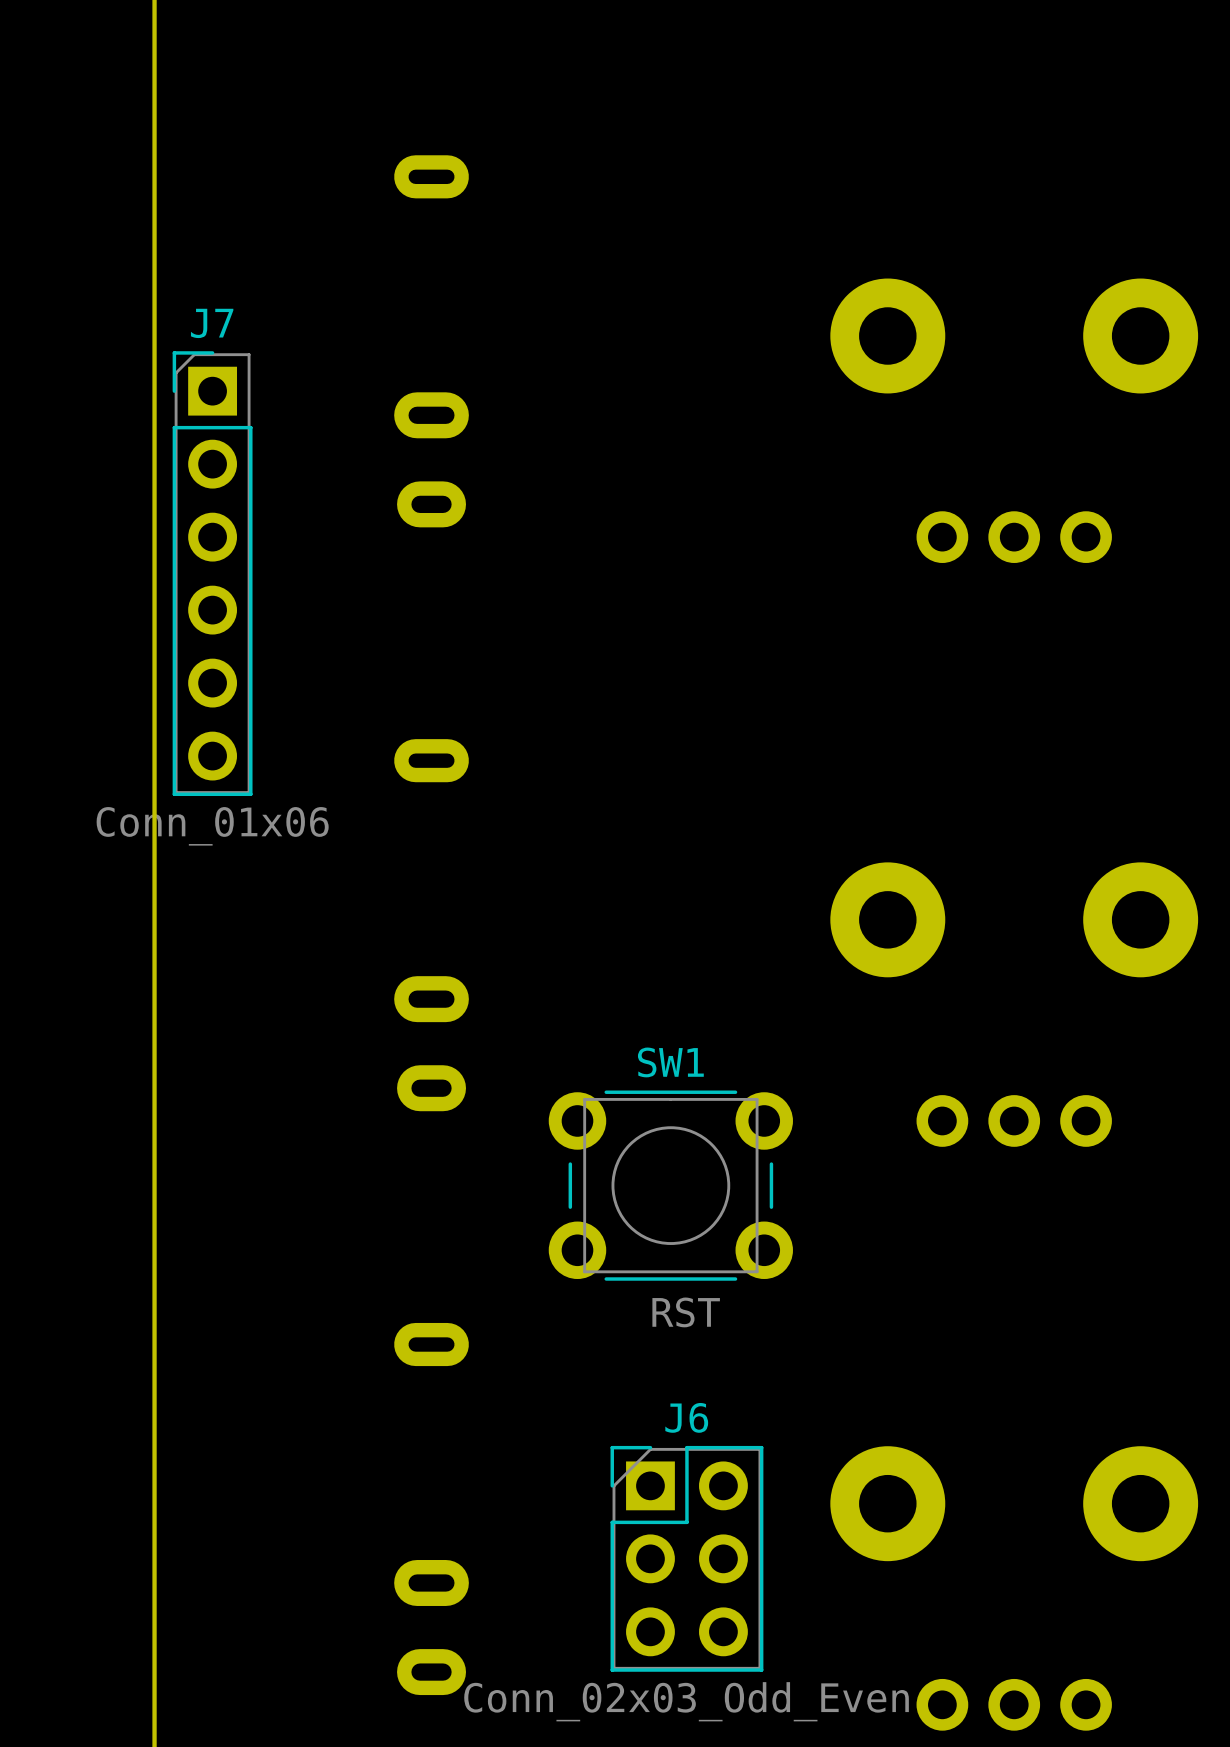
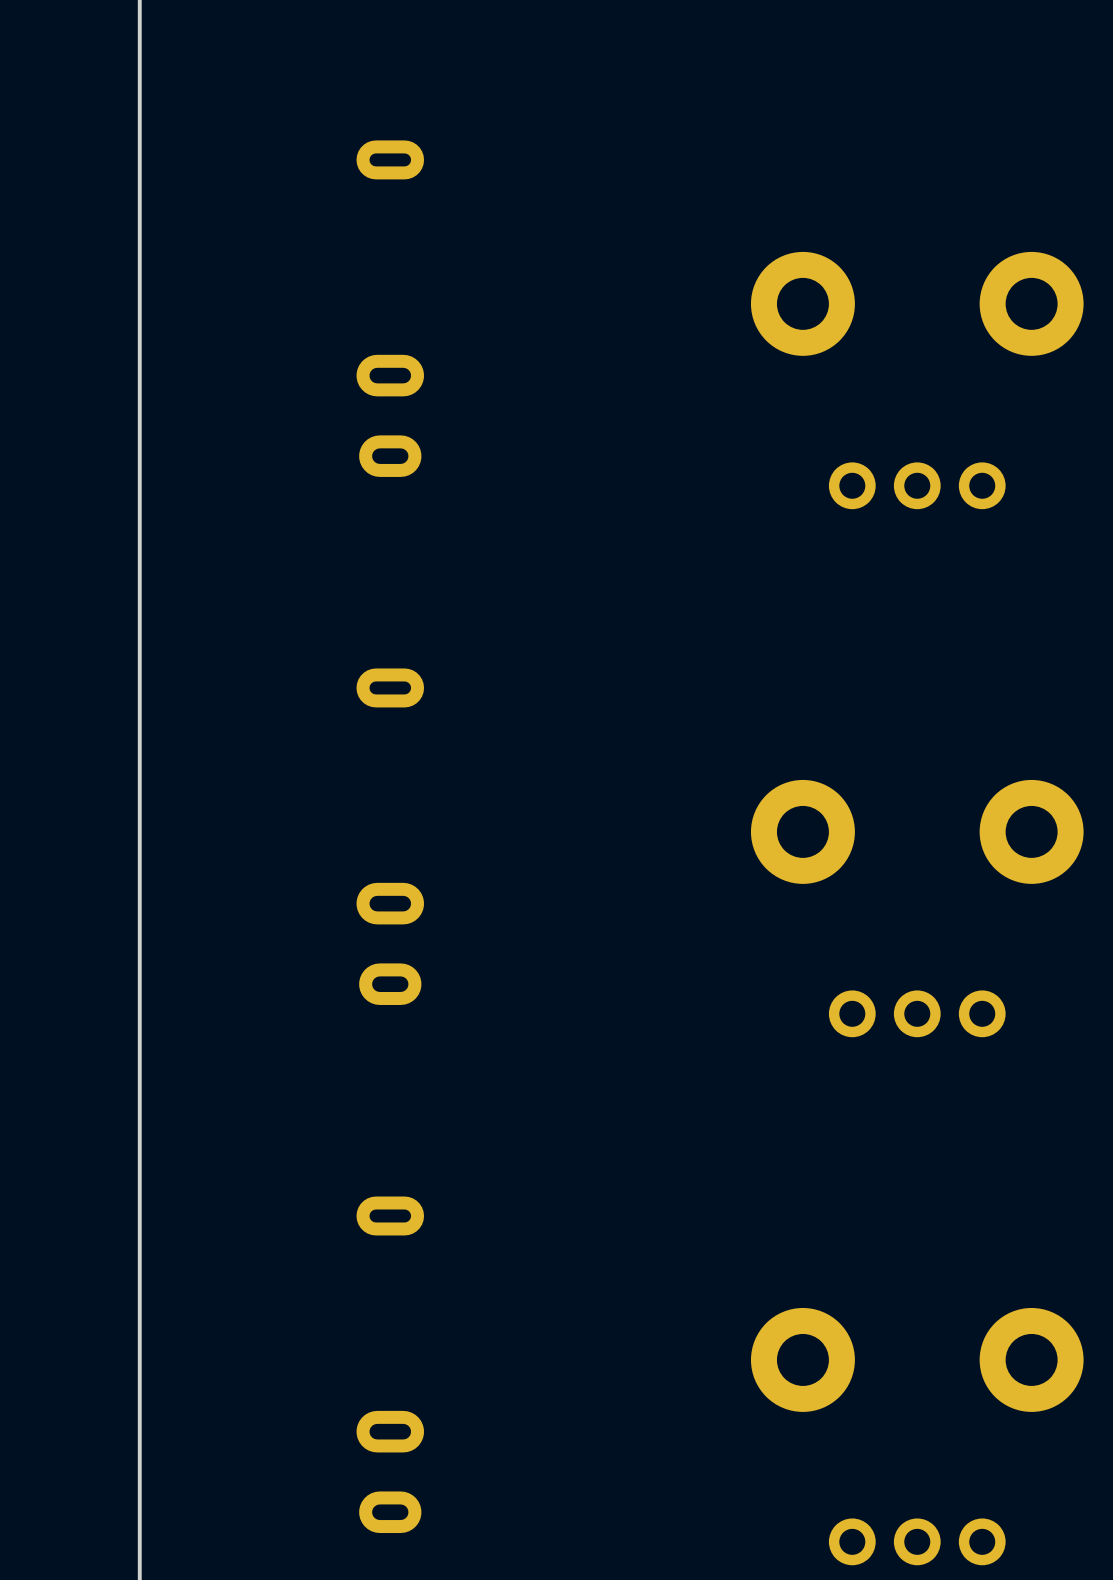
J7: Conn_01x06 (212, 573) -> none
SW1: RST (670, 1185) -> none
J6: Conn_02x03_Odd_Even (686, 1558) -> none

